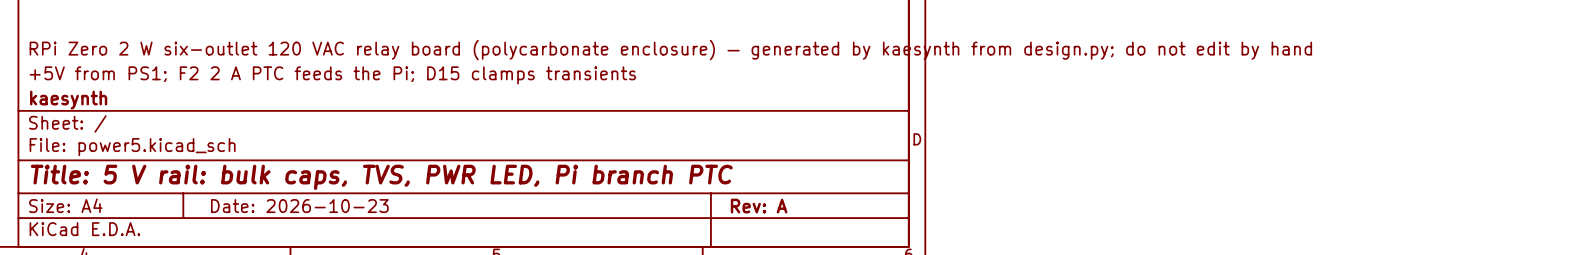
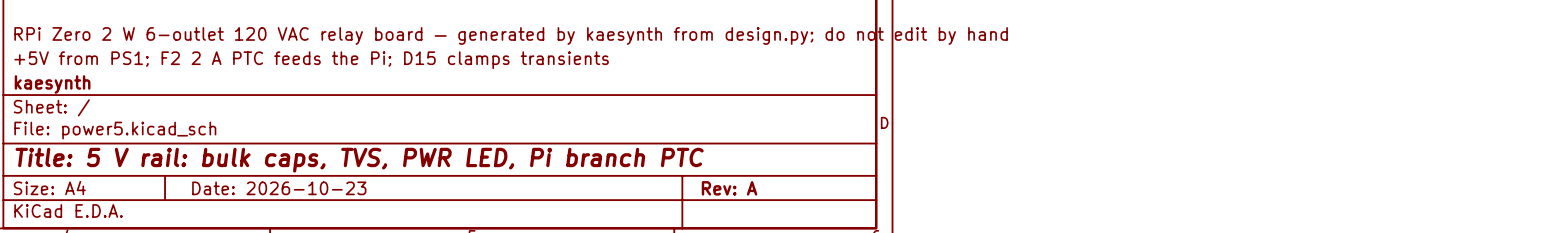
title block: RPi Zero 2 W six-outlet 120 VAC relay board (polycarbonate enclosure) — generated by kaesynth from design.py; do not edit by hand (670, 50) -> RPi Zero 2 W 6-outlet 120 VAC relay board — generated by kaesynth from design.py; do not edit by hand (511, 35)

